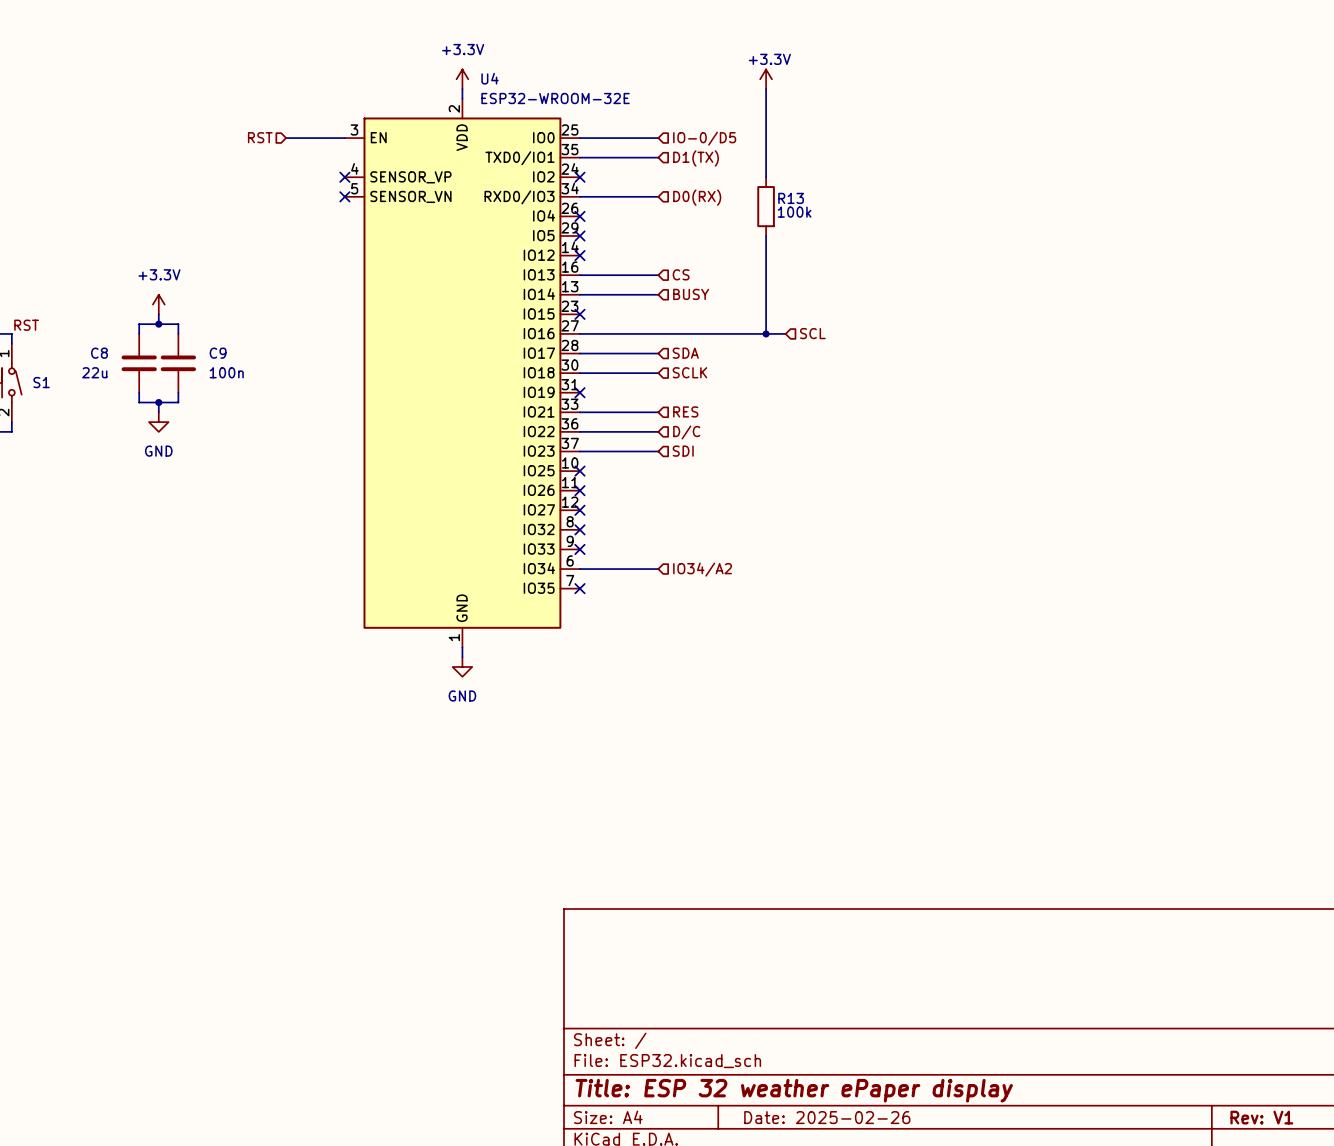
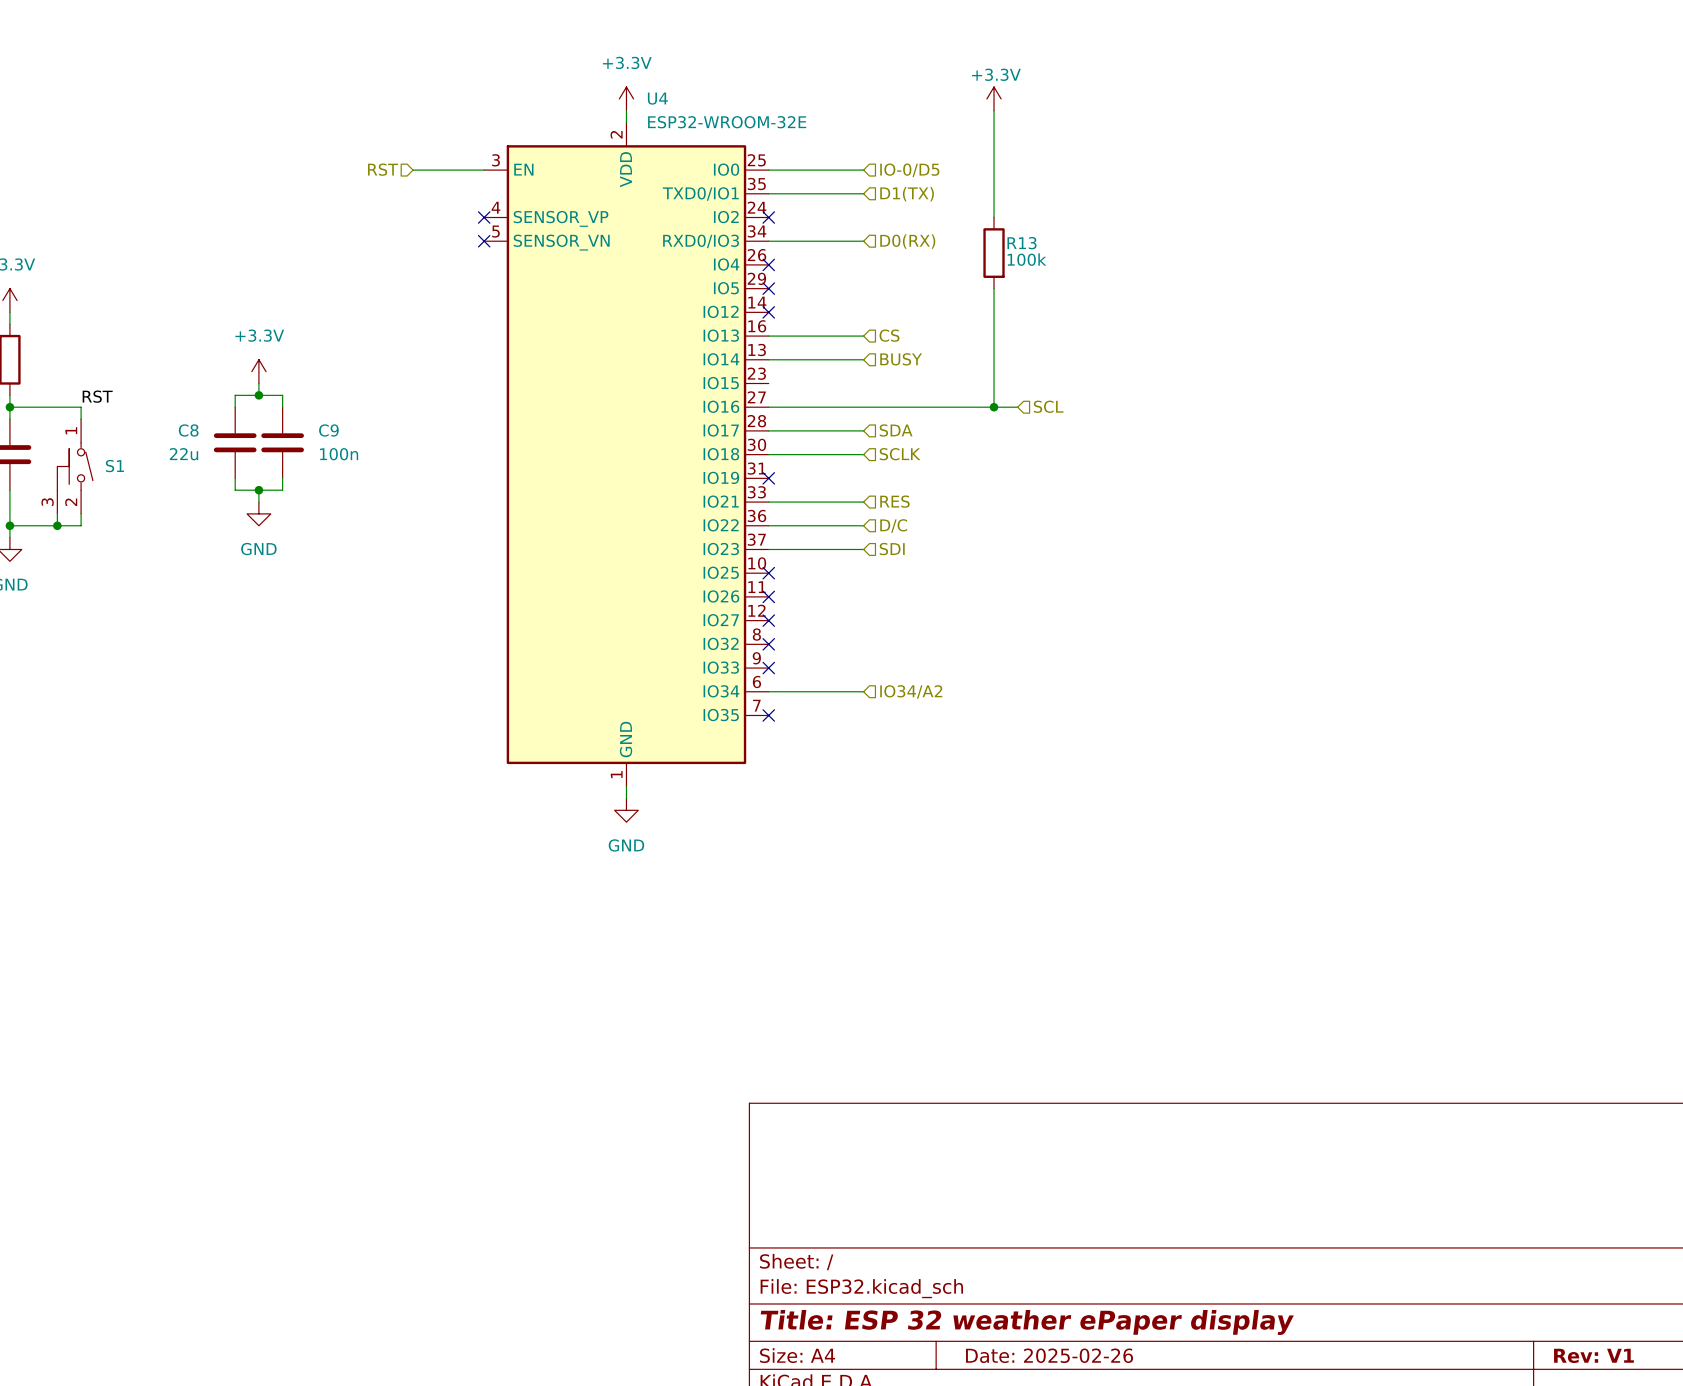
no-connect mark: (579, 314) -> none

